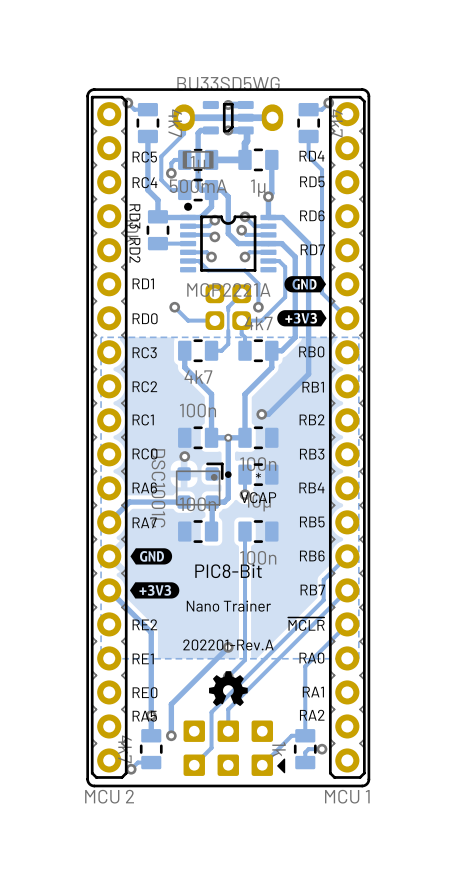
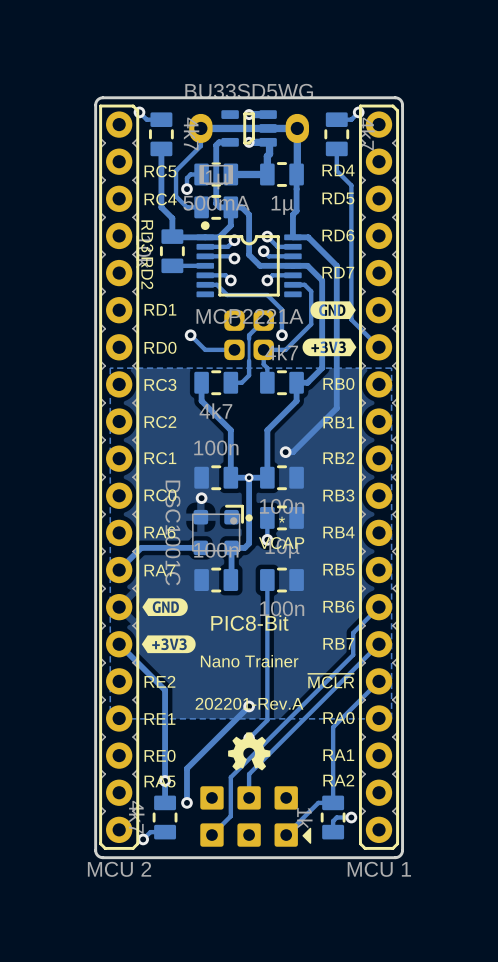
track: none -> (297, 128) (296, 174)
via: (268, 196) -> none

